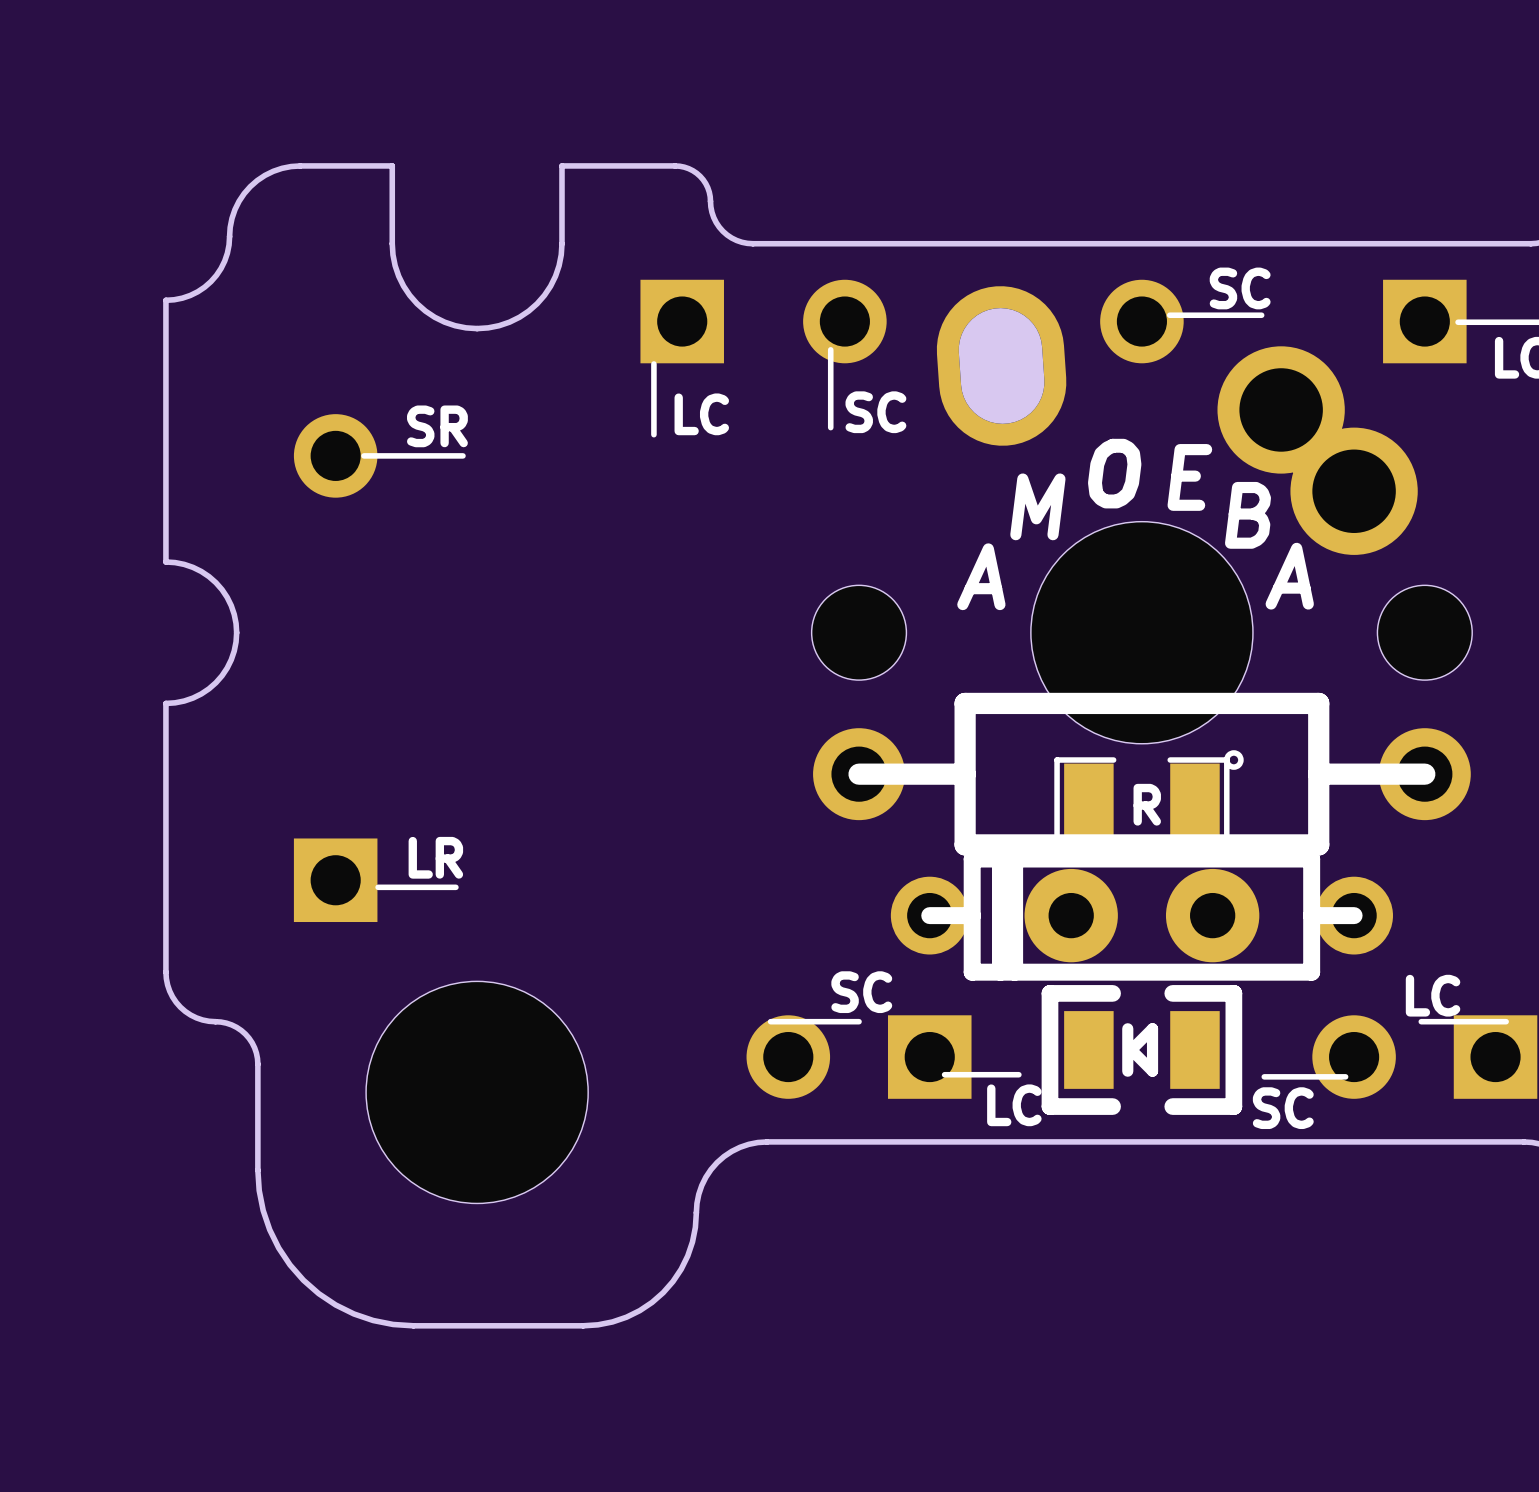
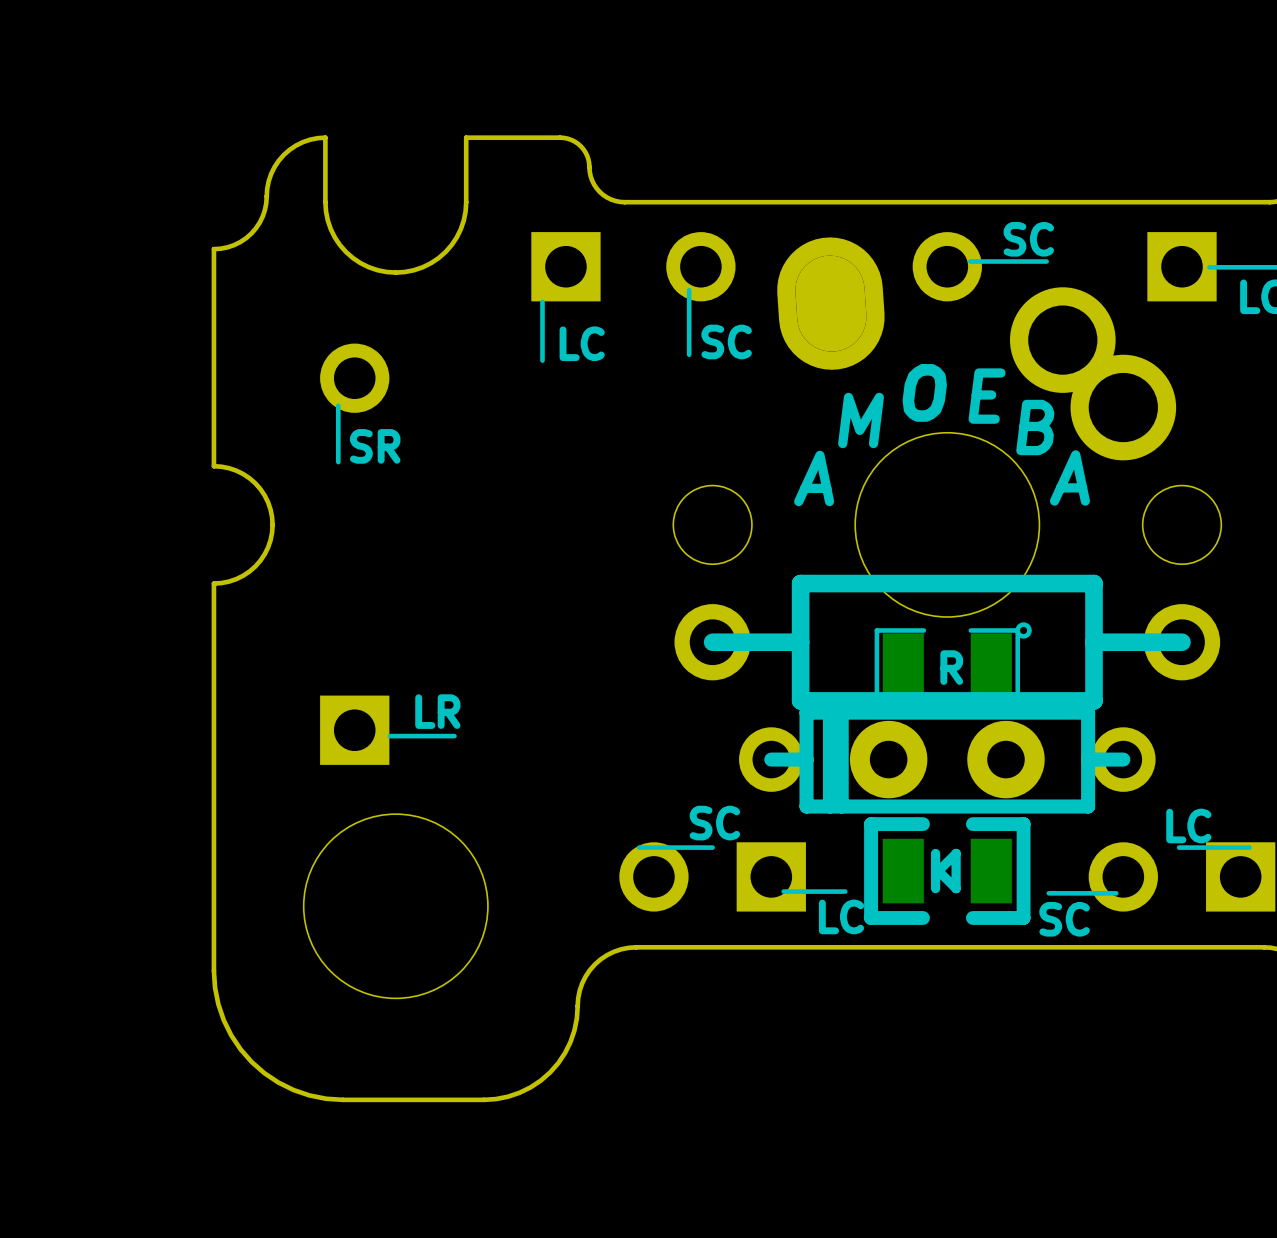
board edge: (392, 165) (291, 166) (264, 175) (244, 193) (234, 209) (230, 227) (227, 253) (216, 275) (204, 287) (190, 295) (165, 300) (165, 561) (184, 564) (208, 576) (227, 597) (236, 623) (236, 641) (231, 659) (215, 682) (193, 698) (165, 703) (166, 978) (172, 996) (185, 1011) (196, 1017) (215, 1021) -> (325, 137) (302, 142) (283, 154) (271, 173) (264, 209) (255, 228) (246, 238) (234, 245) (213, 249) (213, 466) (236, 470) (255, 483) (268, 502) (272, 524) (268, 547) (255, 566) (236, 579) (213, 583) (213, 882)
text position: SR (437, 426) -> SR (375, 446)
part position: (335, 455) -> (354, 378)
line: (462, 455) (363, 455) -> none
line: none -> (338, 405) (338, 462)
text position: LR (435, 857) -> LR (437, 711)
part position: (335, 880) -> (354, 730)
line: (455, 887) (378, 887) -> (454, 736) (389, 736)
board edge: (215, 1021) (231, 1024) (245, 1034) (254, 1047) (257, 1064) -> none

